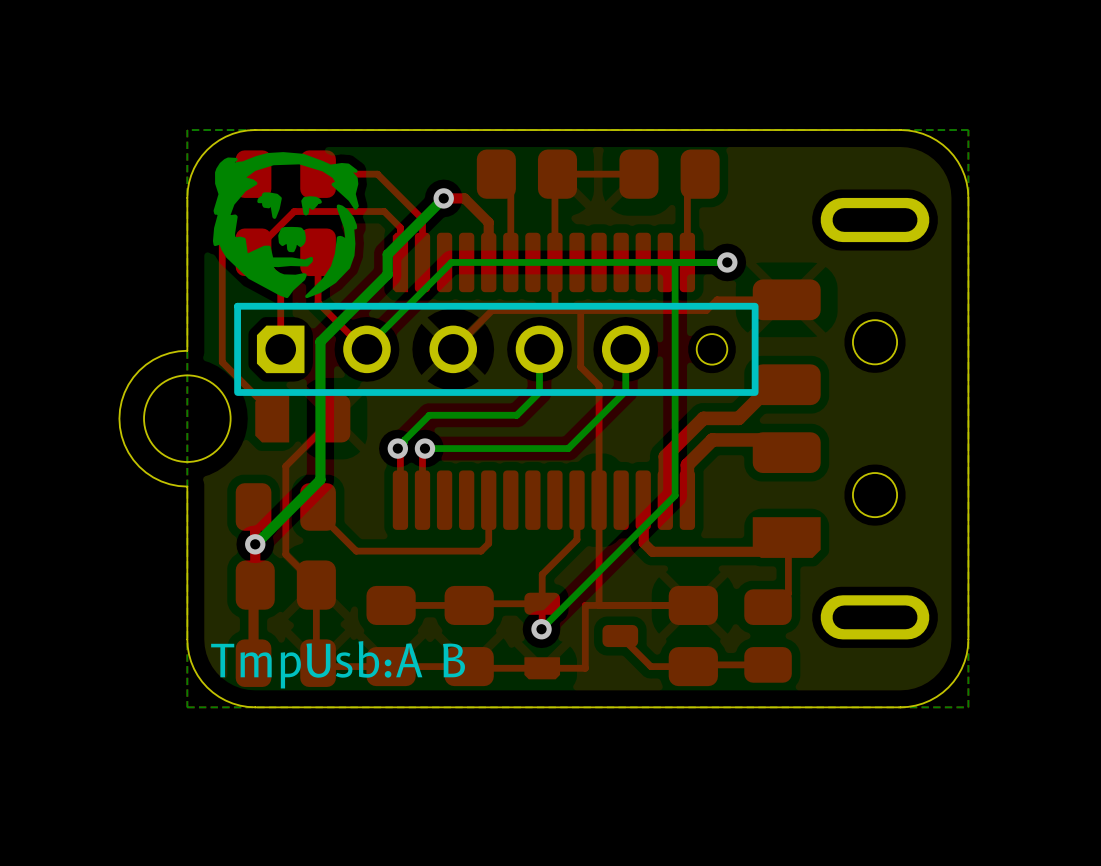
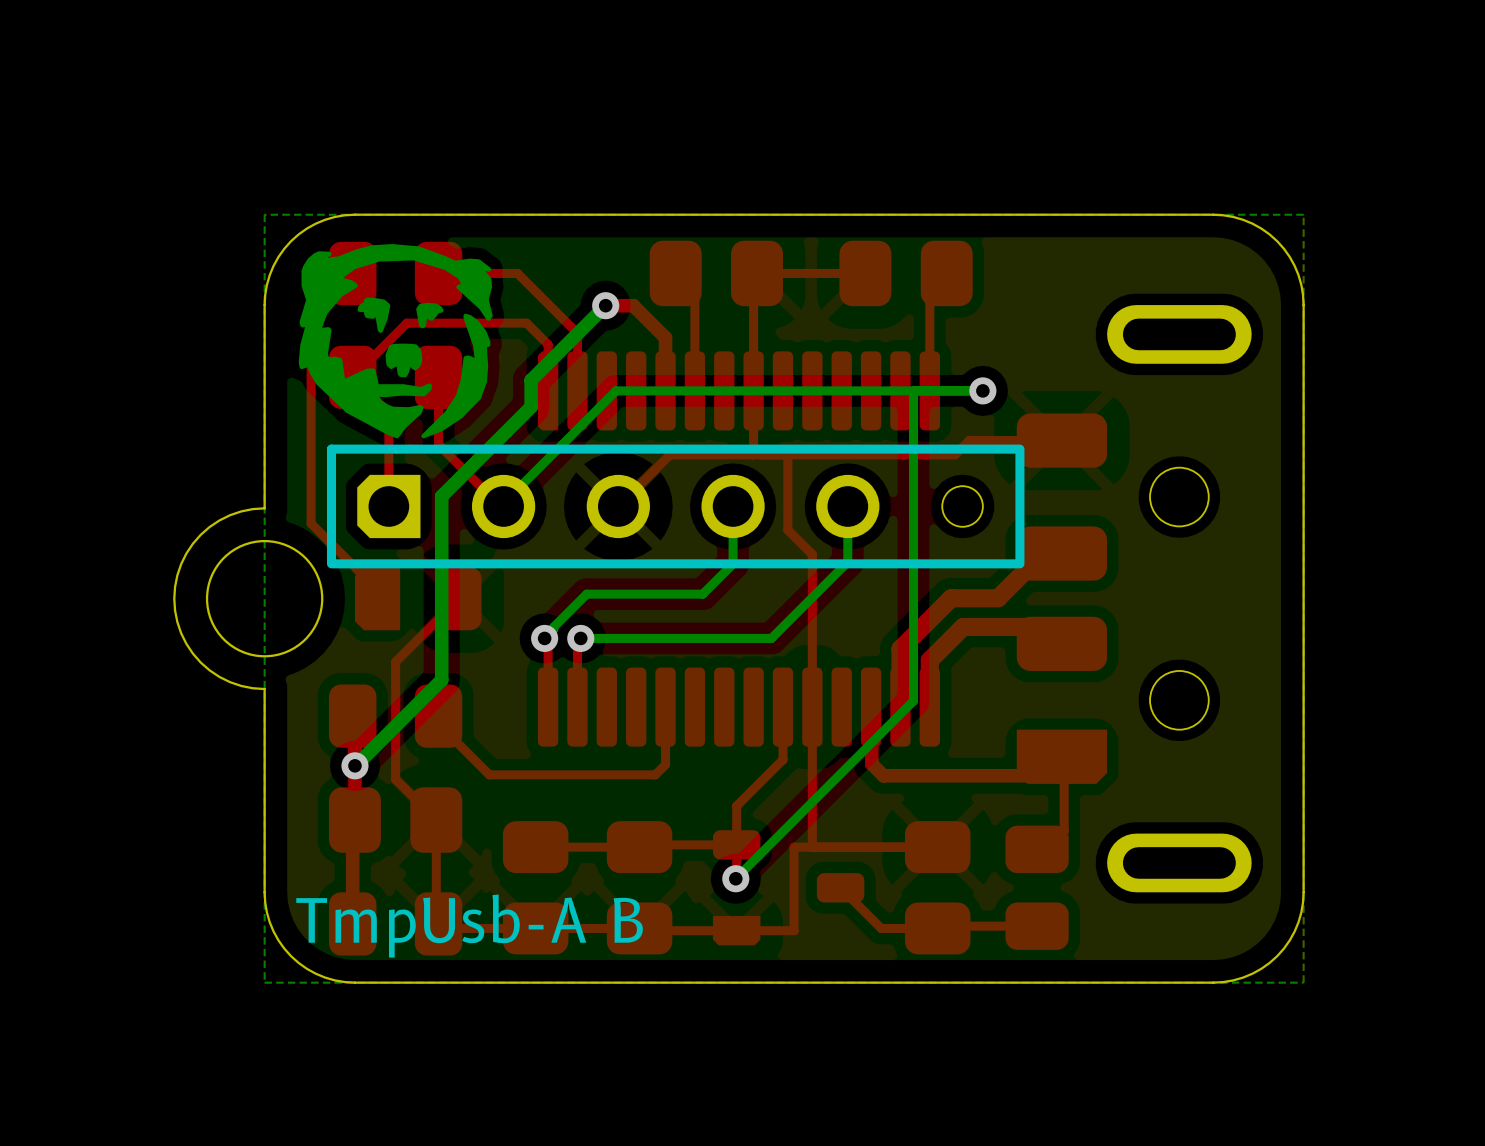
text: TmpUsb:A B (338, 664) -> TmpUsb-A B (469, 926)

